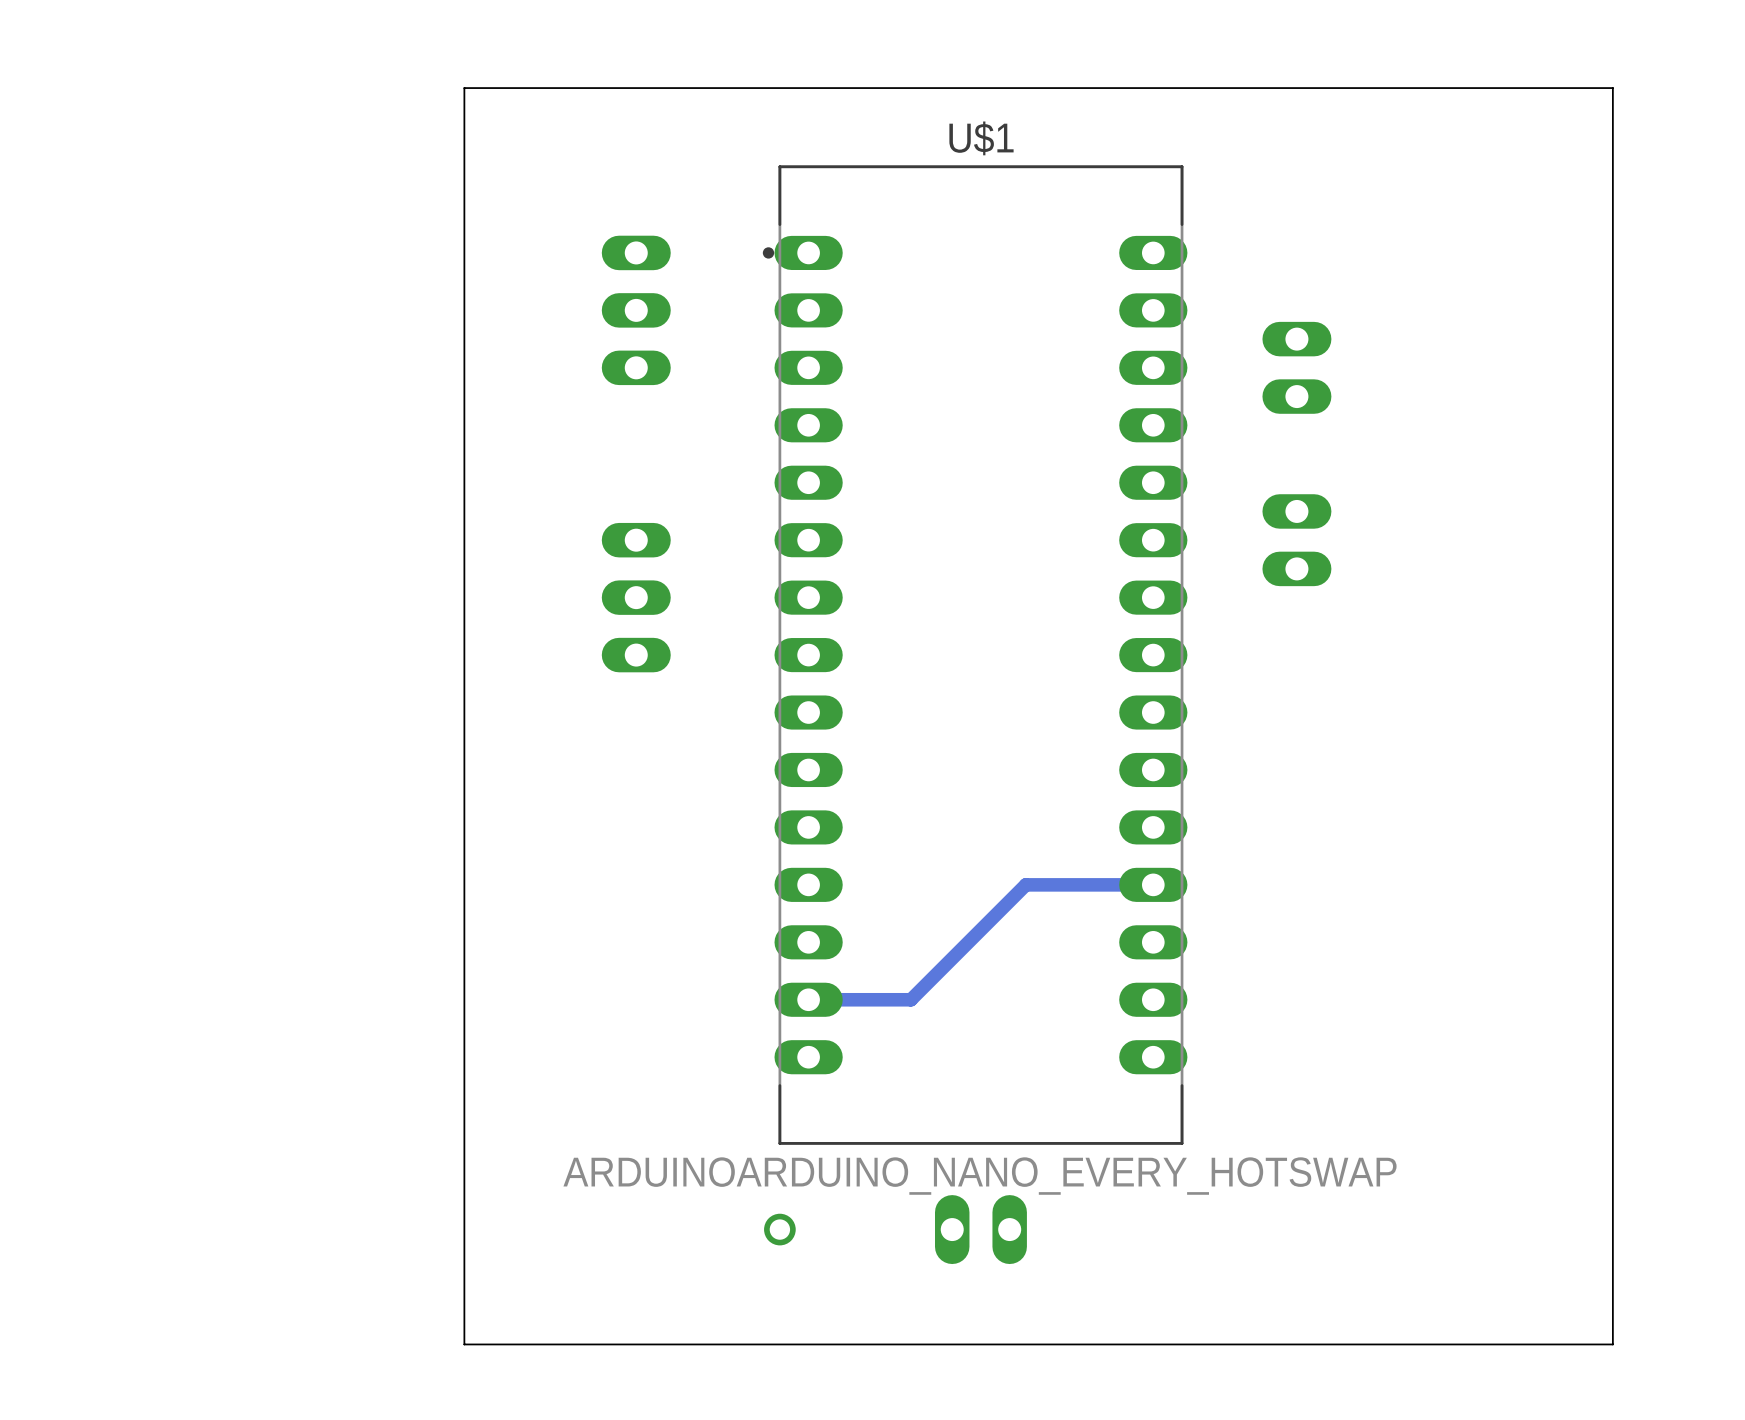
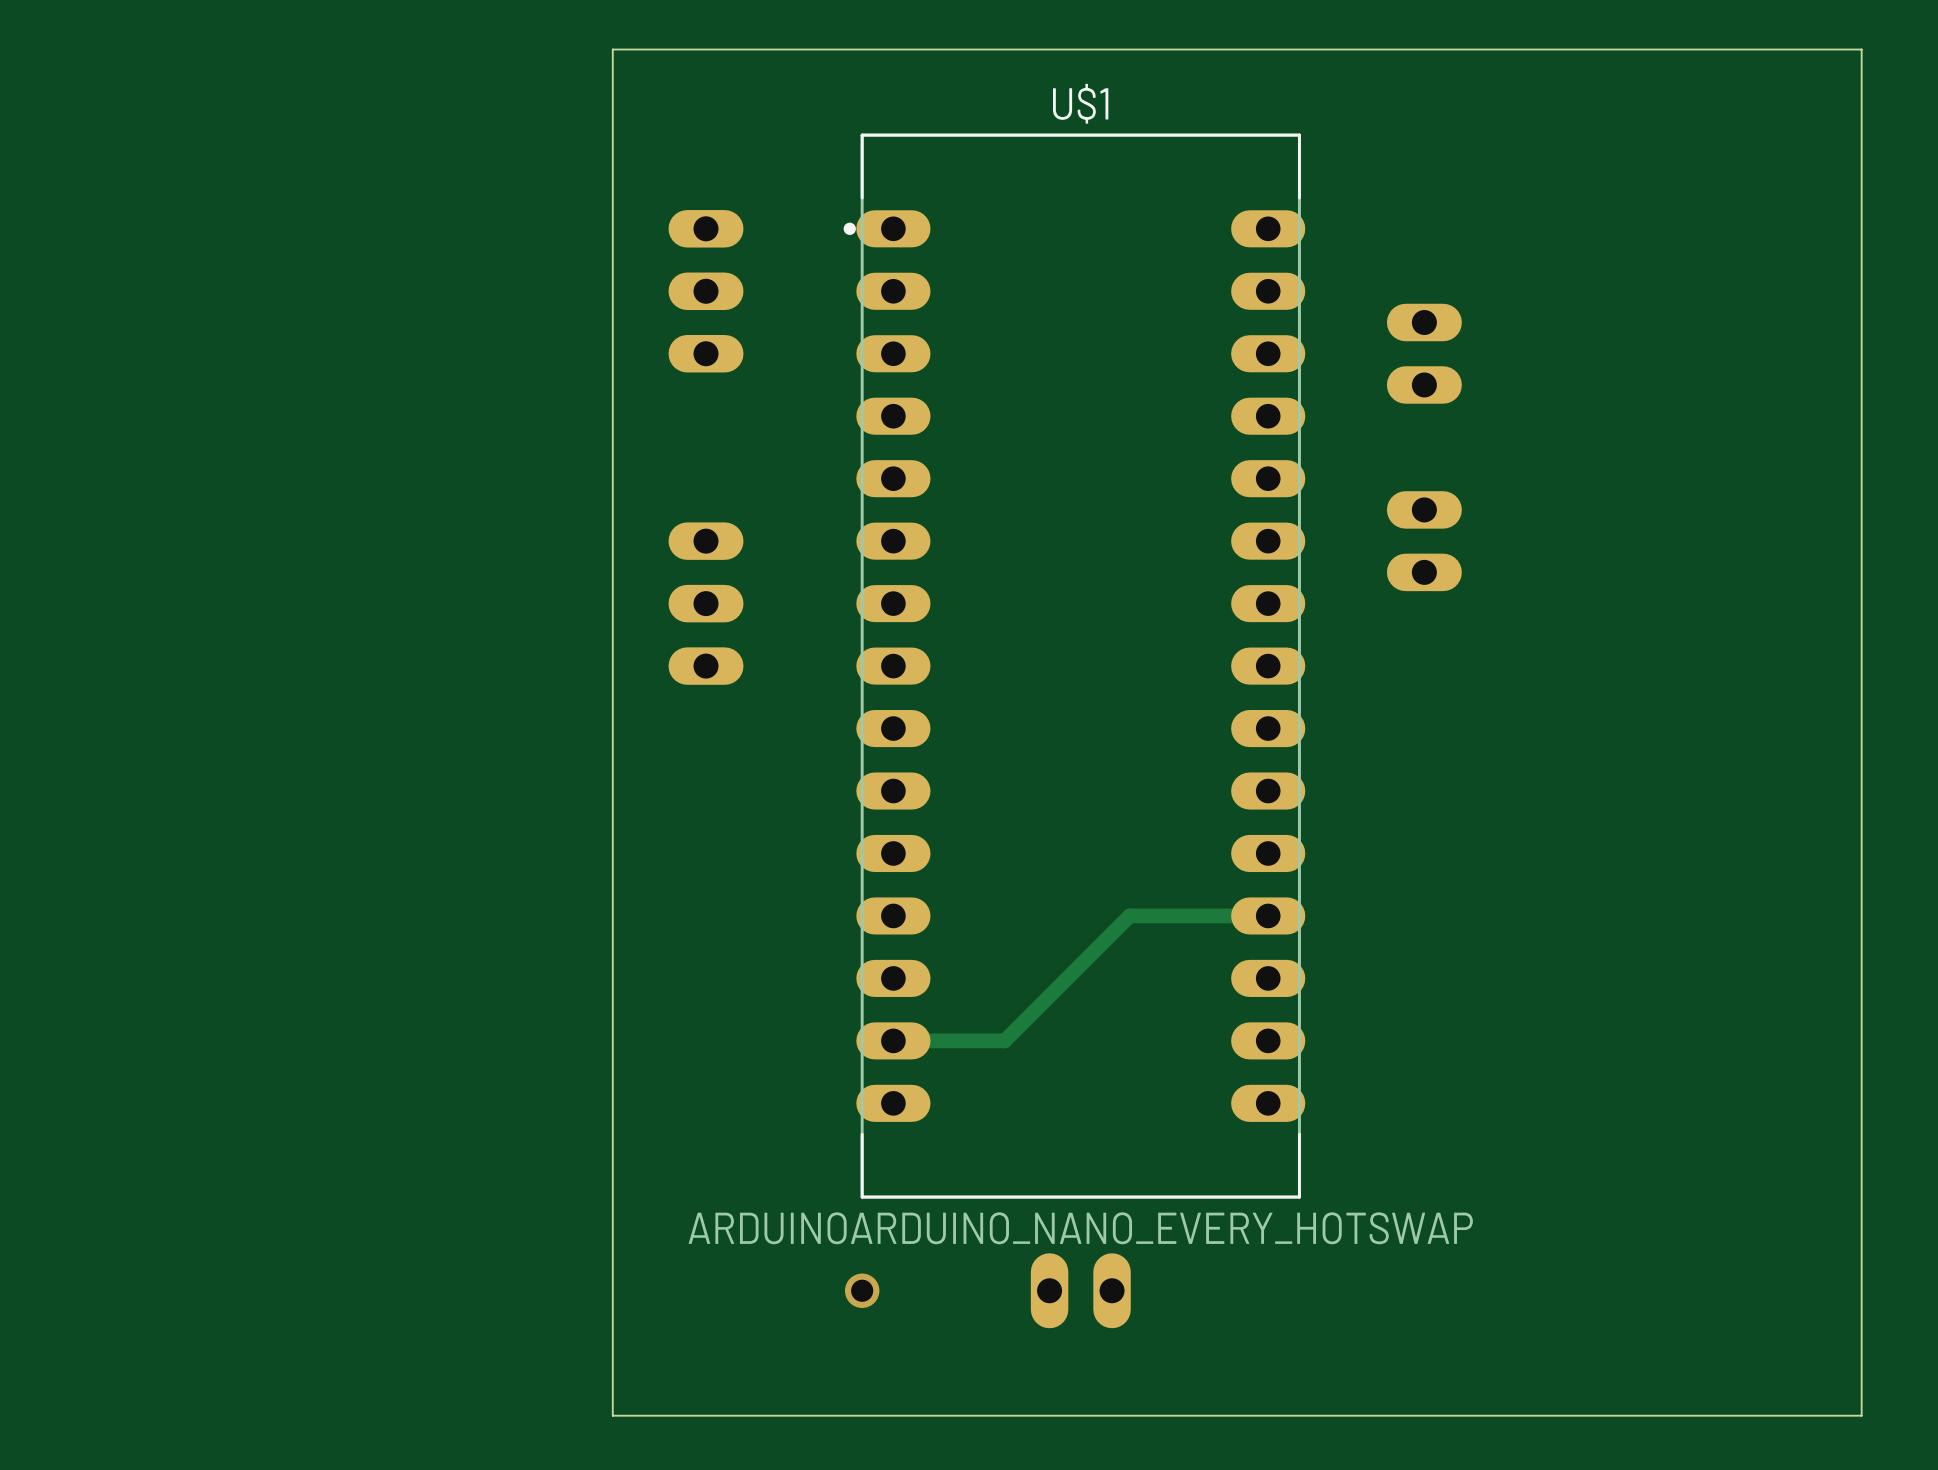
board edge: (550, 88) (464, 88) (464, 1344) (550, 1344) -> (612, 49) (612, 1415)
board edge: (1612, 88) (1612, 1344) -> (1767, 49) (1861, 49) (1861, 1415) (1767, 1415)

